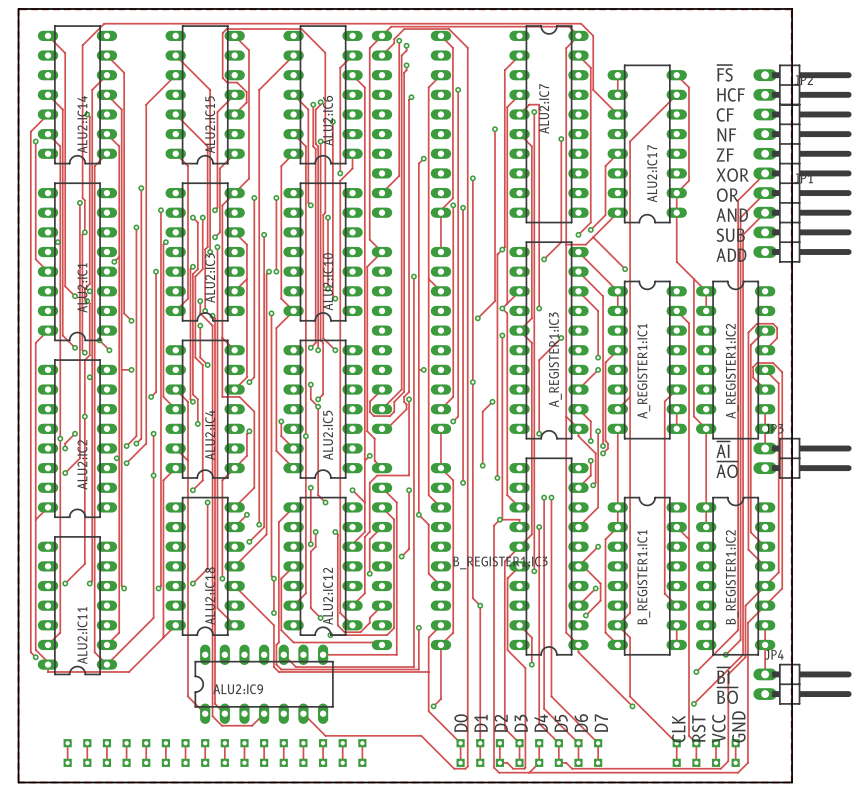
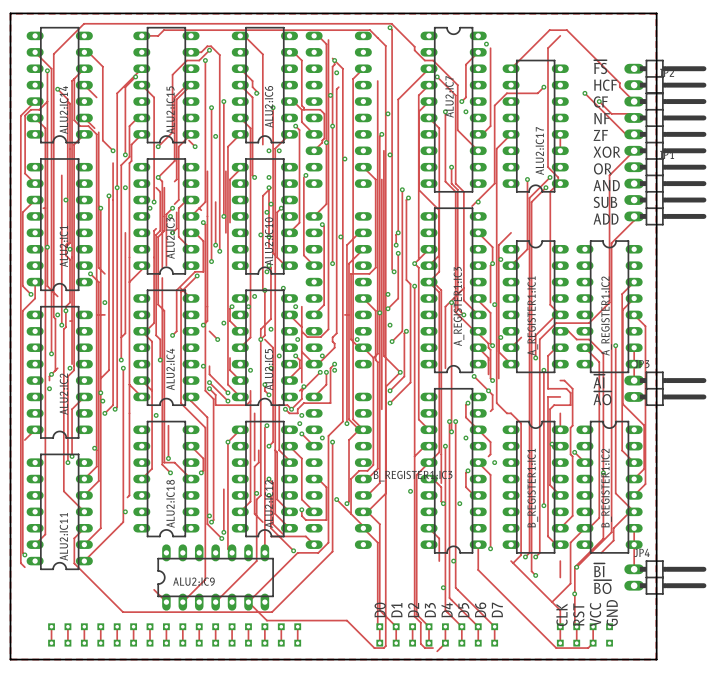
track: (104, 23) (581, 23) (593, 35) (593, 50) -> (82, 25) (84, 23) (391, 23) (414, 46) (414, 50) (424, 60) (433, 60) (457, 85) (457, 130) (478, 150)
track: none -> (390, 27) (392, 29) (392, 269)
via: none -> (390, 27)
track: (226, 29) (222, 33) (222, 78) (227, 82) (237, 82) (246, 91) (246, 102) (234, 114) -> (184, 30) (163, 30) (158, 35) (141, 35)
track: (301, 29) (325, 52) (323, 338) (335, 350) -> none
track: (404, 29) (382, 55) -> (332, 30) (246, 30)
track: (48, 35) (65, 53) (65, 286) (75, 296) -> none
track: (234, 35) (249, 50) (249, 178) (222, 205) (222, 396) (239, 396) (254, 411) (254, 487) (234, 507) -> none
track: none -> (240, 35) (244, 35) (262, 54) (262, 91)
track: none -> (314, 35) (318, 35) (326, 44) (326, 204) (314, 216)
track: (440, 35) (452, 47) (452, 198) (440, 210) (440, 252) -> none
track: none -> (560, 35) (548, 48) (548, 167) (558, 177) (558, 183) (550, 191) (550, 304) (560, 314)
via: (399, 40) -> none
track: (82, 45) (82, 198) (84, 200) (84, 232) (82, 234) (82, 350) (84, 352) -> (64, 43) (53, 54) (55, 370)
track: (406, 45) (406, 50) (401, 55) (401, 389) (382, 409) -> none
via: (406, 45) -> none
via: none -> (486, 44)
track: none -> (209, 50) (199, 60) (186, 60) (172, 74) (172, 132) (158, 146)
via: none -> (209, 50)
track: none -> (35, 52) (51, 68) (51, 353)
track: (106, 55) (124, 72) (124, 151) -> (84, 52) (88, 52) (102, 66) (102, 140) (113, 150)
track: (175, 55) (210, 89) (210, 252) -> none
track: none -> (191, 52) (201, 52) (207, 46) (211, 46) (219, 54) (219, 251)
track: (293, 55) (259, 89) (259, 121) -> none
track: (352, 55) (340, 67) (340, 173) -> (289, 52) (293, 52) (301, 60) (301, 105) (303, 107)
track: (519, 55) (504, 70) (504, 247) (497, 254) (497, 333) -> (408, 197) (406, 200) (406, 280) (410, 284)
track: (578, 55) (590, 67) (590, 222) (578, 234) -> (478, 52) (465, 64) (465, 97) (461, 101)
track: none -> (332, 58) (342, 68) (342, 421) (328, 435) (328, 542) (318, 552)
track: none -> (205, 60) (205, 202) (191, 216)
via: none -> (205, 60)
track: none -> (240, 68) (252, 81) (252, 87) (258, 93)
track: (352, 75) (364, 87) (364, 423) -> (295, 355) (299, 360)
track: none -> (429, 68) (398, 99) (398, 232) (396, 234) (396, 245)
track: (617, 75) (617, 94) -> (511, 68) (549, 30) (566, 30) (619, 83) (619, 87) (634, 101)
track: (676, 75) (689, 87) (689, 180) (676, 193) (676, 261) (706, 291) (706, 310) -> none
via: none -> (47, 70)
via: none -> (336, 72)
track: none -> (135, 76) (125, 87) (125, 154)
via: none -> (135, 76)
via: none -> (437, 76)
via: (458, 89) -> none
track: (593, 89) (617, 114) -> (490, 81) (490, 126) (482, 134) (478, 134)
track: (48, 94) (62, 109) -> (47, 70) (47, 97)
track: none -> (141, 85) (154, 97) (154, 202)
track: none -> (191, 85) (186, 85) (174, 97) (174, 161) (158, 177) (162, 181) (162, 257)
track: (676, 94) (630, 141) (630, 613) (617, 625) (630, 637) (630, 696) (676, 743) -> (511, 561) (560, 610) (560, 626)
via: (411, 97) -> none
track: none -> (543, 87) (537, 93) (506, 93) (494, 105) (494, 183) (472, 206)
via: none -> (543, 87)
track: none -> (57, 89) (67, 99) (67, 243) (65, 245)
via: (320, 102) -> none
track: (313, 104) (313, 146) (315, 148) (315, 342) (310, 347) -> none
track: (320, 104) (315, 109) (315, 143) (318, 146) (318, 350) -> (262, 93) (262, 124)
track: none -> (584, 93) (625, 134) (634, 134)
via: none -> (584, 93)
via: none -> (330, 95)
track: (121, 109) (121, 153) -> (74, 78) (74, 120) (80, 126) (88, 126) (96, 134)
track: (534, 112) (534, 340) -> (431, 280) (441, 290)
via: (534, 112) -> none
track: none -> (47, 101) (39, 109) (30, 109) (25, 115) (25, 173) (35, 183)
via position: (87, 114) -> (57, 89)
track: (175, 114) (207, 146) (207, 247) -> (172, 208) (168, 212)
track: none -> (223, 101) (223, 216)
via: none -> (223, 101)
track: none -> (289, 101) (293, 101) (301, 109) (301, 122) (314, 134)
track: (519, 114) (529, 104) (539, 104) (539, 126) -> (429, 101) (419, 111) (419, 190) (439, 210) (439, 255) (429, 265)
via: none -> (461, 101)
track: none -> (599, 101) (611, 113) (630, 113) (634, 117)
via: none -> (599, 101)
via: none -> (211, 107)
track: (369, 121) (369, 48) (391, 26) (569, 26) (578, 35) (566, 48) (566, 632) (578, 644) -> none
track: (369, 124) (369, 205) -> (303, 109) (320, 109) (324, 113) (324, 138) (314, 150)
via: none -> (445, 111)
via: none -> (465, 111)
via: none -> (387, 113)
track: (494, 129) (494, 301) (477, 318) -> none
via: (494, 129) -> none
track: (30, 131) (30, 652) (33, 654) -> (20, 115) (20, 563) (24, 567)
track: none -> (141, 117) (137, 117) (129, 126) (129, 156) (121, 165) (121, 360)
track: (561, 139) (561, 222) -> (437, 76) (455, 95) (455, 183) (463, 191)
via: (561, 139) -> none
track: (35, 141) (35, 259) (48, 271) -> none
via: (35, 141) -> none
via: (320, 141) -> none
track: none -> (295, 126) (299, 130) (299, 222) (289, 232)
via: none -> (295, 126)
via: none -> (332, 126)
track: (119, 146) (119, 632) -> (98, 206) (100, 208) (100, 528) (94, 534)
track: (175, 153) (187, 166) (187, 298) (175, 310) -> (141, 134) (131, 144) (129, 181)
track: (352, 153) (352, 168) (340, 180) (340, 477) -> (289, 134) (275, 148) (275, 513) (279, 518)
via: none -> (381, 134)
track: none -> (560, 134) (560, 150)
via: none -> (215, 136)
track: (423, 158) (418, 163) (418, 514) (428, 524) (428, 573) (440, 586) -> (381, 134) (379, 136) (379, 483) (367, 495) (363, 495)
via: (423, 158) -> none
track: none -> (188, 140) (195, 146)
via: none -> (326, 142)
track: (281, 166) (281, 207) -> (240, 167) (230, 179)
track: (320, 166) (320, 227) -> (271, 187) (262, 195)
track: (605, 166) (605, 215) (590, 229) -> (500, 144) (496, 148) (496, 403) (521, 423) (521, 555) (513, 563)
via: none -> (158, 146)
via: none -> (195, 146)
via: none -> (113, 150)
via: none -> (268, 150)
track: none -> (383, 150) (383, 355) (400, 372) (385, 386) (385, 493) (367, 511)
track: (399, 175) (382, 193) -> (328, 152) (328, 329) (320, 337) (307, 337) (301, 331)
via: none -> (125, 154)
track: (472, 178) (472, 598) (480, 605) (480, 743) -> (367, 511) (379, 524) (379, 610) (396, 626)
via: none -> (344, 158)
via: (141, 188) -> none
track: none -> (363, 167) (375, 179) (375, 267) (369, 273) (351, 273) (351, 339) (373, 357) (373, 464) (367, 470) (359, 470) (351, 478) (351, 513)
track: none -> (451, 167) (451, 183) (457, 189) (457, 308) (463, 314)
via: none -> (451, 167)
track: (765, 193) (740, 217) (740, 625) -> (632, 509) (613, 528)
via: (254, 197) -> none
via: (276, 197) -> none
track: (738, 200) (738, 283) -> (634, 216) (634, 220) (611, 243)
track: none -> (611, 173) (609, 175) (609, 302) (589, 323) (556, 323) (539, 339) (539, 552) (535, 556)
via: (79, 202) -> none
via: none -> (305, 175)
via: none -> (158, 177)
via: none -> (268, 177)
track: (453, 205) (453, 396) (440, 409) -> none
via: (453, 205) -> none
track: none -> (550, 177) (529, 197) (529, 552) (525, 556)
via: none -> (550, 177)
via: (463, 207) -> none
via: none -> (527, 179)
via: (160, 210) -> none
via: (215, 210) -> none
track: (539, 210) (539, 308) -> (445, 181) (455, 191) (455, 312) (474, 331) (478, 331) (488, 343) (490, 349) (490, 378) (492, 380)
track: (617, 212) (585, 244) (566, 244) -> none
track: (765, 212) (743, 234) (743, 406) -> none
via: none -> (117, 187)
via: none -> (125, 187)
via: (192, 217) -> none
via: (202, 217) -> none
track: none -> (545, 187) (531, 202) (531, 571) (535, 575)
via: none -> (545, 187)
track: none -> (402, 189) (402, 331) (392, 341)
via: none -> (402, 189)
via: none -> (408, 197)
via: (590, 229) -> none
track: none -> (35, 200) (22, 212) (22, 286) (31, 294)
track: (234, 232) (244, 242) -> (209, 331) (217, 339)
via: none -> (154, 202)
via: (264, 234) -> none
via: (215, 237) -> none
via: none -> (271, 204)
track: (593, 237) (625, 269) -> none
track: (369, 239) (382, 252) (367, 266) (367, 360) -> (303, 206) (303, 255) (314, 265)
via: (57, 242) -> none
via: none -> (100, 208)
track: (165, 242) (163, 244) (163, 396) (175, 409) -> none
via: (165, 242) -> none
via: none -> (150, 208)
via: none -> (172, 208)
track: none -> (281, 208) (277, 212) (277, 257) (285, 265) (289, 265)
via: none -> (281, 208)
track: (561, 242) (544, 259) -> (463, 208) (463, 300) (478, 314)
track: (246, 244) (246, 377) (234, 389) -> none
via: (217, 247) -> none
via: none -> (266, 212)
via: (502, 249) -> none
via: none -> (223, 216)
track: (578, 252) (617, 291) (617, 310) -> (527, 179) (527, 249) (511, 265)
track: (119, 256) (114, 261) -> (176, 228) (172, 232)
track: none -> (203, 222) (205, 224) (205, 390) (213, 399) (213, 520) (211, 522)
via: none -> (203, 222)
track: (281, 259) (281, 298) (293, 310) (276, 328) (276, 450) (278, 453) -> (230, 144) (227, 146) (227, 384)
via: (544, 259) -> none
via: (114, 261) -> none
track: none -> (322, 224) (324, 226) (324, 304) (314, 314)
via: none -> (322, 224)
via: (192, 266) -> none
track: (217, 266) (217, 340) -> (191, 232) (195, 232) (203, 241) (203, 271) (195, 271) (176, 290)
track: none -> (361, 230) (346, 245) (346, 423)
via: (625, 269) -> none
via: (156, 271) -> none
via: none -> (172, 232)
track: (269, 271) (266, 274) (266, 534) (234, 566) -> none
via: (269, 271) -> none
via: (276, 271) -> none
via: none -> (398, 232)
via: none -> (260, 234)
via: none -> (268, 236)
track: (413, 276) (413, 667) (296, 667) (283, 654) -> none
track: (246, 279) (234, 291) -> (191, 200) (186, 200) (178, 208) (178, 236) (191, 249)
track: (428, 279) (440, 291) -> (346, 503) (349, 501) (349, 440) (359, 429) (349, 419) (349, 263) (363, 249)
track: (693, 279) (693, 416) (706, 428) (706, 527) -> none
track: (264, 286) (264, 465) -> (209, 388) (215, 394)
via: none -> (215, 245)
via: none -> (396, 245)
via: none -> (47, 247)
via: (327, 288) -> none
track: (595, 288) (603, 296) -> (511, 232) (498, 245) (498, 253)
track: none -> (492, 247) (490, 302)
track: (578, 291) (598, 310) (598, 357) -> none
via: none -> (219, 251)
via: (75, 296) -> none
track: none -> (398, 253) (398, 298) (387, 308)
via: none -> (398, 253)
via: (335, 298) -> none
via: (87, 301) -> none
via: (200, 301) -> none
via: none -> (500, 259)
track: (259, 306) (259, 524) -> none
via: none -> (211, 261)
track: (404, 308) (404, 392) (394, 401) (394, 411) (389, 416) (374, 416) (370, 412) (370, 401) (382, 389) -> none
via: none -> (332, 263)
via: (539, 308) -> none
via: none -> (492, 263)
via: (205, 310) -> none
via: none -> (268, 265)
track: (676, 310) (689, 323) (689, 463) -> none
track: (200, 313) (212, 325) (212, 716) (221, 725) -> (84, 528) (74, 538) (74, 563) (123, 612) (180, 612)
track: (271, 313) (271, 576) (273, 578) -> none
via: (271, 313) -> none
track: none -> (141, 269) (129, 282)
track: (212, 315) (215, 318) (215, 703) (224, 713) -> (197, 275) (181, 292) (181, 403) (205, 427) (205, 579) (182, 602)
via: (212, 315) -> none
via: none -> (266, 271)
track: none -> (90, 273) (98, 282) (98, 481) (84, 495)
via: none -> (90, 273)
via: (131, 320) -> none
via: none -> (197, 275)
via: (200, 325) -> none
track: (48, 330) (35, 342) (35, 649) (48, 662) (48, 671) (129, 671) (175, 625) -> (35, 282) (35, 298) (22, 310) (22, 552)
via: none -> (283, 288)
via: (561, 337) -> none
track: (99, 340) (109, 350) -> none
via: (99, 340) -> none
via: none -> (264, 290)
via: none -> (31, 294)
via: none -> (387, 294)
via: (75, 347) -> none
via: (109, 350) -> none
via: (318, 350) -> none
via: (335, 350) -> none
track: none -> (363, 298) (375, 310) (375, 360) (377, 362) (377, 468) (367, 479) (363, 479)
track: none -> (478, 298) (490, 312) (490, 343) (492, 345)
track: (617, 350) (605, 362) (605, 441) (607, 443) (607, 448) (603, 453) -> none
track: (765, 350) (777, 338) (777, 327) (773, 323) (757, 323) (748, 332) (748, 549) (765, 566) -> (634, 298) (622, 309) (622, 404) (644, 425) (644, 469) (634, 479)
via: (84, 352) -> none
via: none -> (104, 302)
track: none -> (451, 302) (451, 431)
via: none -> (451, 302)
track: (200, 357) (207, 364) -> (162, 304) (162, 464) (170, 472)
track: none -> (232, 306) (230, 308) (230, 321) (240, 331)
via: none -> (232, 306)
via: none -> (248, 306)
via: none -> (295, 306)
via: none -> (387, 308)
via: none -> (65, 310)
via: (207, 364) -> none
via: none -> (379, 312)
track: none -> (558, 312) (535, 335) (535, 357)
via: none -> (57, 314)
via: (131, 369) -> none
track: none -> (289, 314) (301, 327)
via: (423, 369) -> none
via: none -> (463, 314)
track: (598, 369) (578, 389) -> none
via: (598, 369) -> none
via: (89, 377) -> none
track: (190, 379) (190, 399) (192, 401) -> (154, 323) (143, 333)
via: none -> (223, 323)
track: (79, 382) (79, 458) (65, 473) -> none
via: none -> (61, 325)
track: (84, 384) (84, 563) (65, 583) -> (65, 327) (63, 329) (63, 491) (84, 511)
track: (310, 384) (310, 399) (318, 406) -> (268, 265) (270, 267) (270, 319) (260, 329) (260, 345)
via: (310, 384) -> none
via: none -> (271, 329)
track: (217, 389) (217, 608) (234, 625) -> (176, 331) (172, 335)
track: none -> (406, 331) (404, 333) (404, 376) (390, 390)
via: none -> (406, 331)
track: (676, 389) (664, 401) (664, 593) (676, 605) -> (560, 331) (568, 331) (576, 339) (589, 339) (603, 353) (603, 538) (574, 567) (574, 624)
track: (765, 389) (753, 377) (753, 367) (757, 363) (773, 363) (782, 372) (782, 588) (747, 622) (747, 762) (738, 772) (499, 772) (494, 767) (494, 525) (499, 519) (519, 519) (519, 527) -> (414, 456) (424, 446) (429, 446)
via: none -> (172, 335)
via: (151, 396) -> none
track: (305, 396) (305, 460) -> (250, 337) (240, 347)
via: none -> (500, 337)
via: none -> (217, 339)
track: none -> (264, 339) (273, 347) (273, 442) (268, 446)
via: none -> (297, 339)
track: (409, 399) (409, 475) (401, 475) -> (334, 364) (330, 368) (330, 403)
via: (409, 399) -> none
via: none -> (357, 339)
via: (192, 401) -> none
via: none -> (392, 341)
track: (492, 401) (482, 411) (482, 465) -> none
via: (492, 401) -> none
via: (318, 406) -> none
via: none -> (492, 345)
via: none -> (615, 345)
track: (676, 409) (676, 428) -> (560, 347) (556, 347) (548, 355) (548, 388) (566, 388) (570, 392)
track: none -> (584, 347) (599, 362) (599, 518) (589, 528) (584, 528) (570, 542)
track: none -> (301, 351) (314, 364)
via: none -> (51, 353)
via: (84, 416) -> none
track: (566, 416) (578, 428) (578, 436) (595, 453) (595, 465) -> (474, 376) (492, 394)
via: none -> (279, 355)
via: none -> (295, 355)
via: none -> (322, 355)
via: (281, 421) -> none
via: (453, 421) -> none
via: none -> (535, 357)
via: none -> (121, 360)
track: (92, 428) (92, 482) -> (84, 396) (72, 409)
via: none -> (334, 364)
track: (440, 428) (440, 468) (453, 480) (453, 632) (440, 644) (440, 698) (433, 706) -> none
track: (617, 428) (617, 527) (605, 539) (605, 632) (617, 644) -> (511, 364) (498, 351) (498, 339) (500, 337)
track: (249, 431) (246, 433) (246, 455) (222, 480) (222, 578) -> none
track: none -> (209, 366) (209, 374) (227, 392)
track: (367, 431) (374, 438) (374, 460) (382, 468) -> (301, 366) (301, 382)
track: (598, 431) (598, 507) (578, 527) -> none
via: (598, 431) -> none
via: (75, 433) -> none
via: none -> (69, 368)
via: none -> (271, 368)
track: (364, 433) (364, 531) (352, 544) -> (299, 368) (289, 380)
via: (539, 433) -> none
track: (94, 436) (94, 652) (106, 664) -> (74, 370) (67, 376) (67, 462)
via: none -> (334, 370)
track: none -> (543, 370) (543, 505)
via: none -> (543, 370)
via: (60, 438) -> none
track: (141, 438) (136, 443) -> (113, 372) (113, 405) (104, 413)
track: none -> (320, 372) (301, 390) (301, 399) (291, 409) (287, 405) (279, 405)
via: none -> (320, 372)
track: none -> (326, 372) (326, 384) (314, 396)
via: none -> (326, 372)
via: none -> (400, 372)
via: none -> (51, 374)
via: (590, 441) -> none
via: (136, 443) -> none
track: (146, 443) (126, 463) -> (117, 376) (117, 407) (115, 409)
via: none -> (474, 376)
via: (126, 446) -> none
via: (603, 446) -> none
via: (65, 448) -> none
via: none -> (492, 380)
track: none -> (209, 382) (227, 401)
via: none -> (209, 382)
track: (497, 450) (497, 477) -> (410, 382) (390, 403)
track: none -> (264, 384) (264, 390) (268, 394)
via: none -> (264, 384)
via: (603, 453) -> none
via: none -> (49, 388)
via: (116, 458) -> none
via: none -> (209, 388)
via: none -> (390, 390)
track: (590, 460) (590, 475) (578, 487) -> none
via: none -> (227, 392)
via: none -> (268, 394)
via: (482, 465) -> none
track: (175, 468) (163, 480) (163, 637) -> (141, 396) (129, 384)
track: none -> (191, 396) (191, 401) (207, 417) (207, 524) (221, 538)
via: (65, 473) -> none
via: none -> (102, 401)
via: none -> (227, 401)
via: (153, 475) -> none
track: (377, 475) (369, 482) (369, 531) (364, 536) (364, 593) (352, 605) -> (310, 403) (303, 403) (297, 409) (297, 413) (289, 413) (285, 409)
via: none -> (390, 403)
track: none -> (467, 403) (465, 405) (465, 417) (490, 442) (490, 454) (488, 456)
via: none -> (467, 403)
track: (264, 477) (264, 527) (249, 541) -> (215, 405) (246, 405) (250, 401)
via: (497, 477) -> none
track: (689, 477) (689, 504) -> (560, 380) (564, 380) (572, 388) (572, 425) (570, 427)
track: none -> (570, 405) (554, 405) (550, 409) (550, 485) (560, 495)
track: (202, 480) (192, 490) -> (164, 407) (164, 462) (174, 462) (191, 479)
via: none -> (115, 409)
via: none -> (285, 409)
via: none -> (291, 409)
via: (463, 482) -> none
via: (593, 485) -> none
via: none -> (104, 413)
via: (310, 487) -> none
track: (382, 487) (396, 502) (396, 576) -> (314, 479) (318, 479) (326, 487)
track: none -> (560, 413) (560, 429)
track: (352, 490) (364, 502) -> none
via: (352, 490) -> none
via: none -> (301, 415)
track: (409, 490) (409, 549) (401, 556) -> none
via: (409, 490) -> none
track: (318, 495) (325, 502) -> (260, 419) (260, 495) (256, 499) (256, 561) (215, 602)
via: none -> (299, 423)
via: none -> (346, 423)
via: (207, 502) -> none
track: none -> (264, 427) (264, 552)
track: (382, 507) (394, 519) (394, 628) (387, 635) (372, 635) -> none
via: none -> (451, 431)
via: none -> (301, 433)
track: (246, 514) (234, 527) -> (201, 472) (203, 470) (203, 458) (191, 446)
via: (246, 514) -> none
via: (418, 514) -> none
via: none -> (322, 437)
via: none -> (465, 437)
via: (499, 519) -> none
via: none -> (227, 442)
via: none -> (332, 442)
via: (259, 524) -> none
via: none -> (552, 444)
via: none -> (268, 446)
track: (382, 527) (369, 539) (369, 573) -> (314, 446) (301, 433)
track: (676, 527) (689, 539) -> (574, 452) (584, 462)
via: none -> (94, 448)
via: (315, 531) -> none
via: (335, 531) -> none
track: (340, 531) (340, 613) -> (279, 450) (289, 460)
via: none -> (574, 452)
track: (689, 536) (689, 642) -> (570, 454) (572, 456) (572, 515) (560, 528)
track: (92, 539) (92, 581) (89, 583) -> none
via: none -> (72, 456)
track: (207, 541) (207, 568) (192, 583) -> none
via: none -> (168, 458)
via: (249, 541) -> none
via: (310, 544) -> none
via: none -> (67, 462)
track: none -> (478, 462) (490, 474) (490, 548)
track: (598, 546) (578, 566) -> none
track: (121, 551) (121, 586) (124, 588) -> (96, 466) (84, 479)
track: (187, 554) (187, 696) (190, 698) -> (152, 468) (141, 479)
via: (401, 556) -> none
track: none -> (467, 470) (465, 472) (465, 487) (474, 495) (478, 495)
via: none -> (467, 470)
via: none -> (170, 472)
via: none -> (201, 472)
via: none -> (603, 472)
track: (580, 563) (600, 583) (600, 600) (585, 615) -> none
track: (293, 566) (281, 578) (281, 630) (293, 642) (382, 642) (382, 644) -> (305, 536) (314, 544)
track: none -> (268, 479) (273, 483) (273, 524) (277, 528)
via: none -> (268, 479)
track: (519, 566) (507, 578) (507, 650) (525, 668) (524, 768) -> (429, 479) (433, 479) (441, 487) (441, 501) (443, 503)
via: (534, 571) -> none
via: (369, 573) -> none
via: (222, 578) -> none
via: (273, 578) -> none
via: none -> (410, 491)
via: (65, 583) -> none
via: (89, 583) -> none
via: (192, 583) -> none
via: none -> (256, 493)
track: (743, 583) (743, 654) (693, 703) -> (615, 493) (634, 511)
track: (234, 586) (273, 625) -> (223, 518) (223, 528)
track: none -> (268, 495) (271, 497) (271, 528) (293, 550)
via: none -> (268, 495)
track: (765, 586) (745, 605) (745, 657) (728, 674) (728, 761) (720, 768) (710, 768) -> (593, 643) (588, 648)
via: (124, 588) -> none
via position: (158, 588) -> (125, 511)
track: (595, 588) (578, 605) -> none
via: (595, 588) -> none
track: (337, 590) (337, 625) -> (277, 499) (289, 511)
via: none -> (336, 499)
via: none -> (346, 503)
via: none -> (443, 503)
via: none -> (459, 503)
via: none -> (543, 505)
via: none -> (301, 509)
track: (382, 605) (369, 617) (369, 622) (360, 632) (344, 632) -> (314, 511) (301, 499) (301, 458) (289, 446)
via: (480, 605) -> none
via: none -> (209, 515)
via: (273, 613) -> none
track: (396, 615) (396, 654) (387, 654) -> (326, 520) (305, 520) (301, 515) (301, 509)
via: (585, 615) -> none
via: none -> (211, 522)
via: (320, 617) -> none
track: (440, 625) (428, 637) (428, 711) (458, 740) -> (336, 499) (377, 542) (377, 624)
track: (676, 625) (676, 644) -> (560, 396) (548, 396) (548, 536) (556, 544) (560, 544)
track: (418, 627) (418, 669) (281, 669) (276, 664) (276, 644) (278, 642) -> (232, 552) (227, 548) (227, 542)
via: (418, 627) -> none
track: (273, 630) (273, 667) (278, 671) (428, 671) -> none
via: none -> (223, 532)
via: (330, 635) -> none
via: none -> (221, 538)
via: none -> (490, 548)
via: none -> (293, 550)
track: (578, 652) (632, 706) -> (478, 550) (478, 570) (556, 648)
track: (323, 654) (362, 654) -> (248, 602) (297, 552)
via: (725, 654) -> none
via: none -> (525, 556)
via: none -> (535, 556)
via: (531, 664) -> none
via: none -> (453, 561)
via: none -> (535, 575)
track: (689, 691) (689, 735) (694, 740) -> (570, 583) (552, 602)
via: none -> (443, 587)
via: (433, 706) -> none
via: (632, 706) -> none
track: (264, 713) (252, 725) -> (332, 442) (332, 551) (272, 612) (205, 612)
track: (735, 743) (735, 762) -> (560, 561) (560, 577)
track: (499, 762) (507, 762) (514, 768) -> (414, 440) (414, 616) (420, 622) (420, 643) (424, 648)
track: (558, 762) (566, 762) (572, 768) (671, 768) -> none

